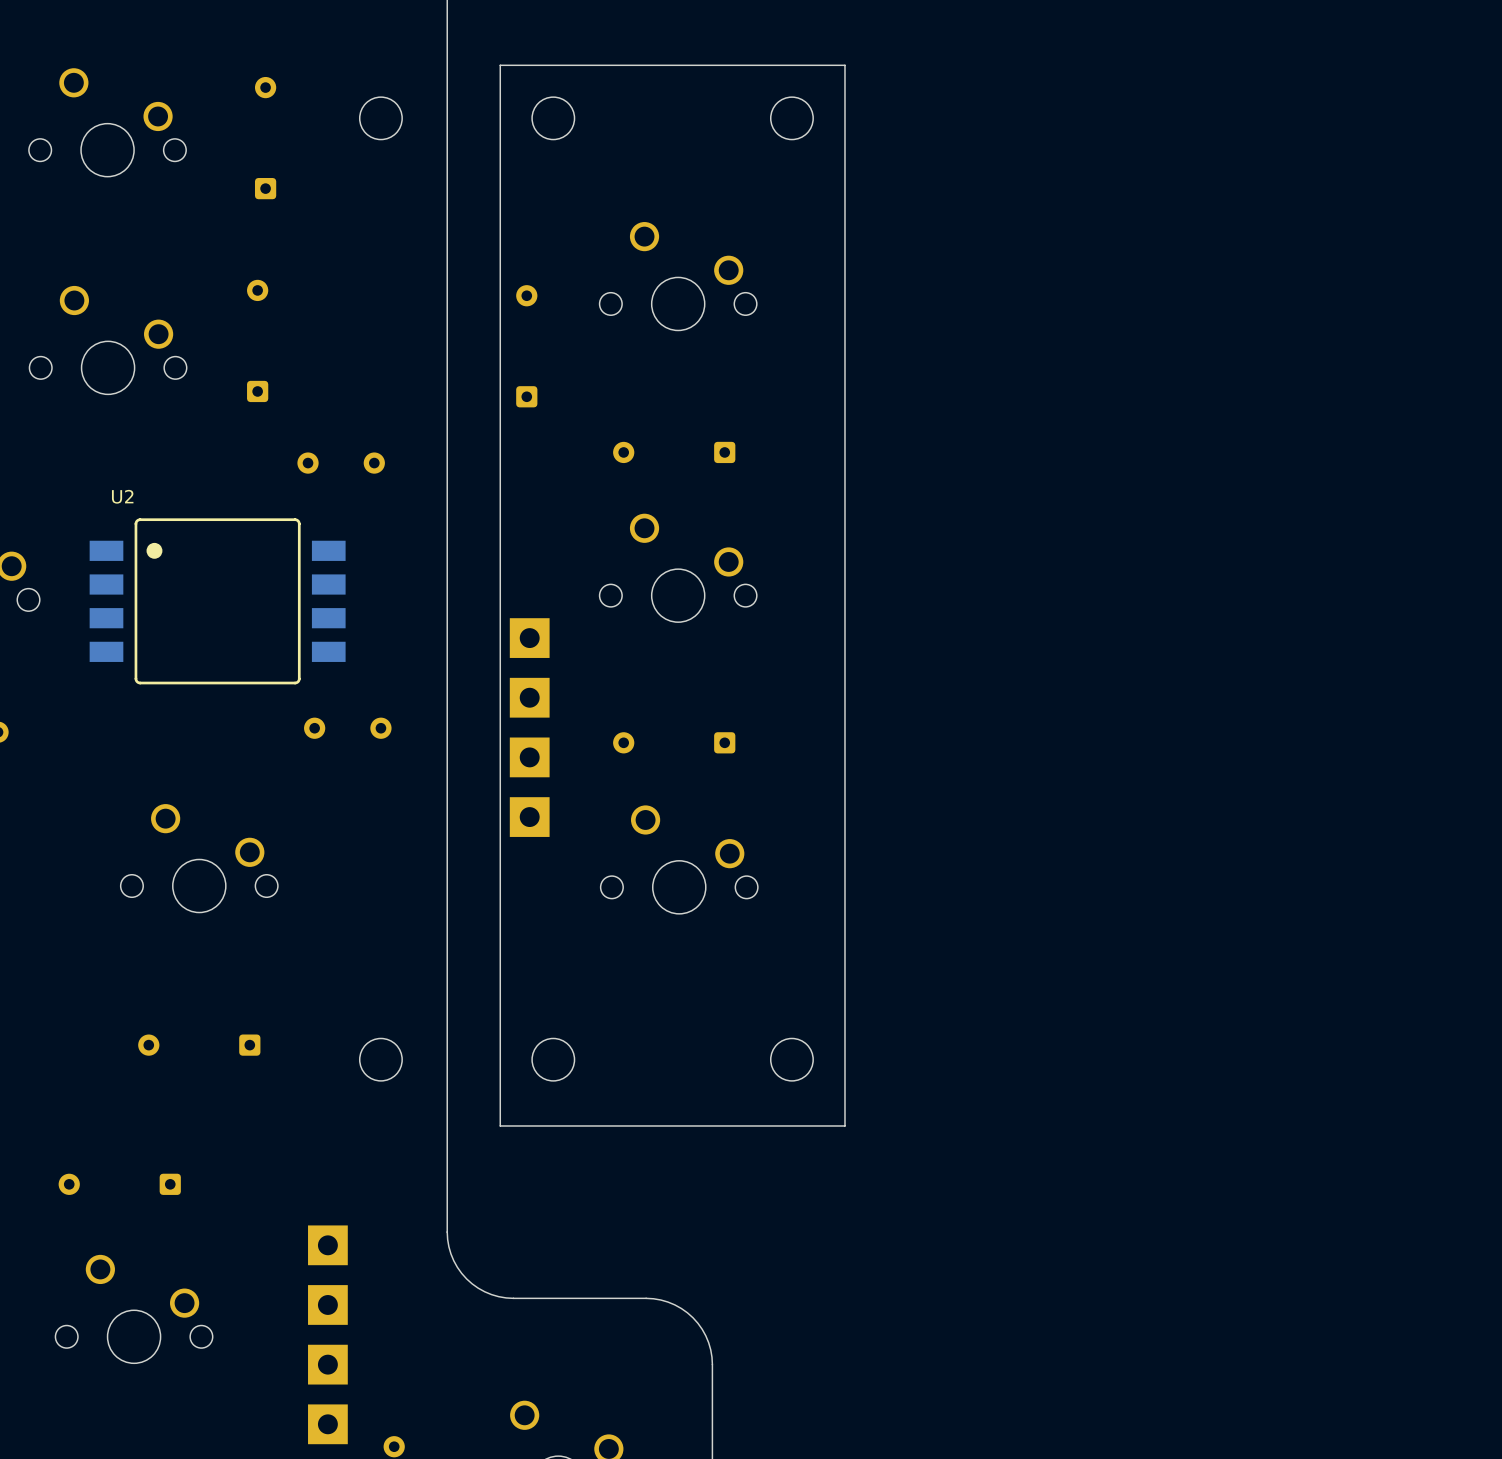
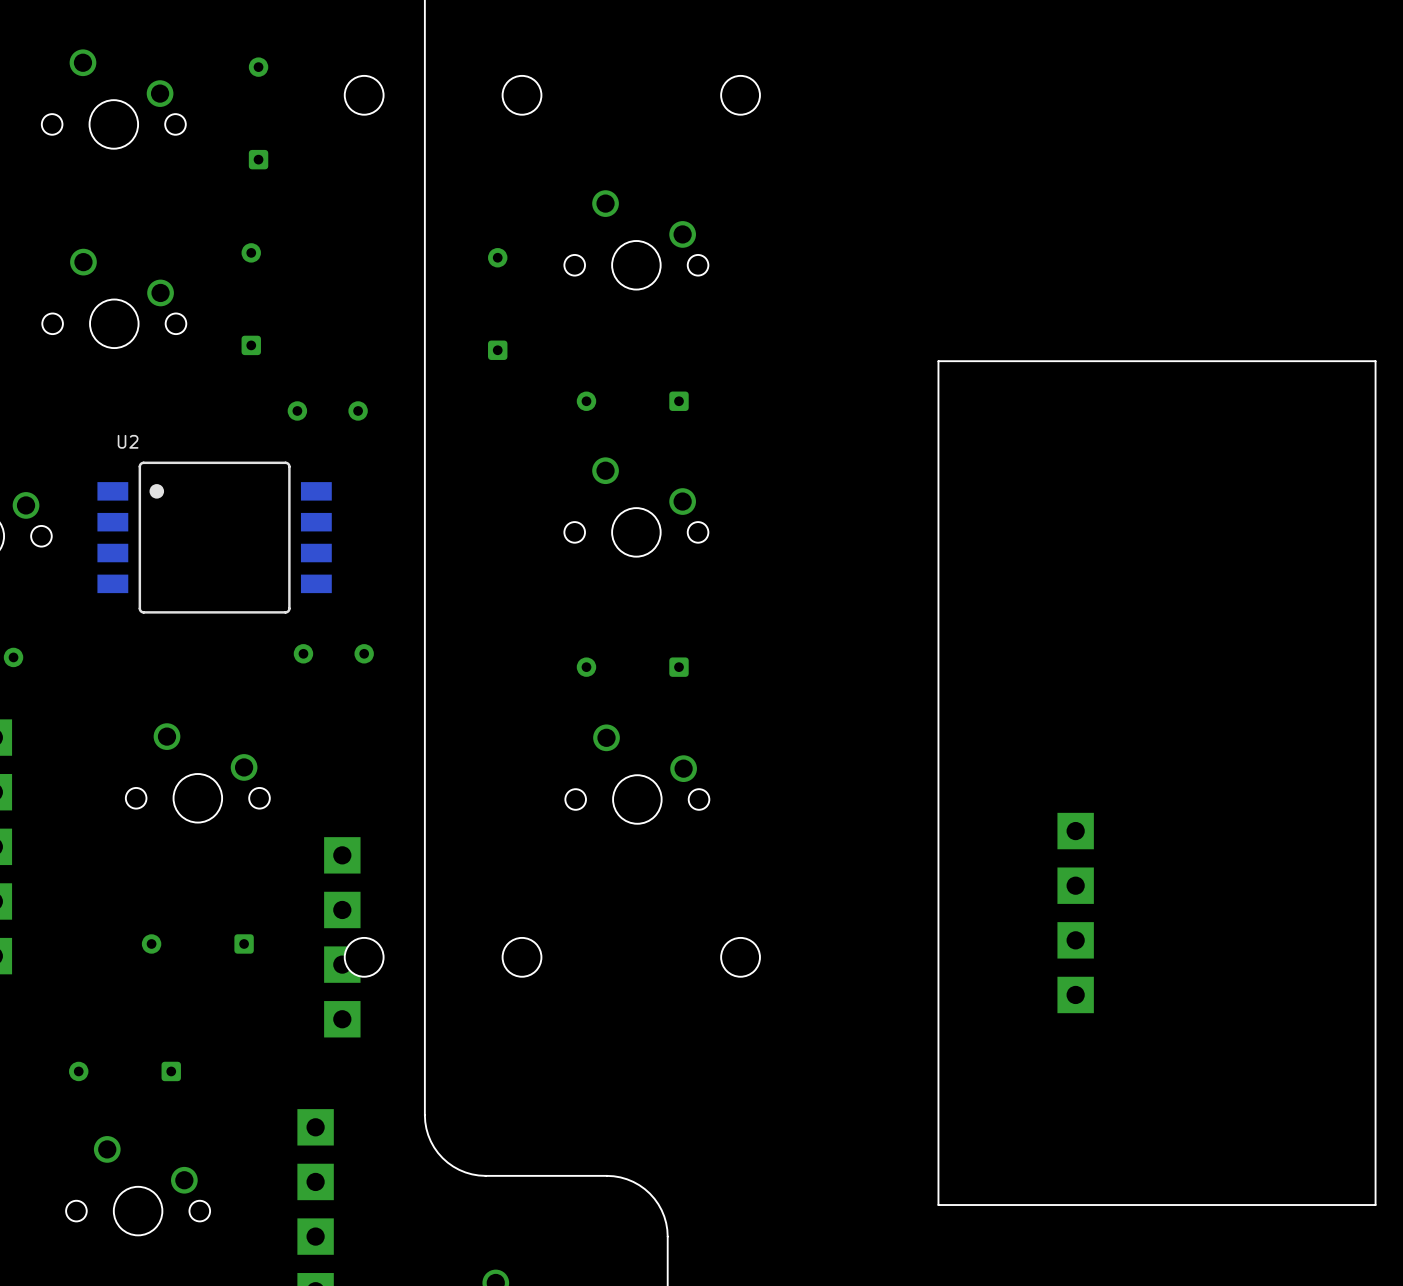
board edge: (844, 65) (500, 65) (500, 1125) (844, 1125) (844, 65) -> none
board edge: none -> (1375, 361) (938, 361) (938, 1205) (1375, 1205) (1375, 361)
part: (529, 727) -> none
part: none -> (1075, 913)
part: none -> (342, 937)

